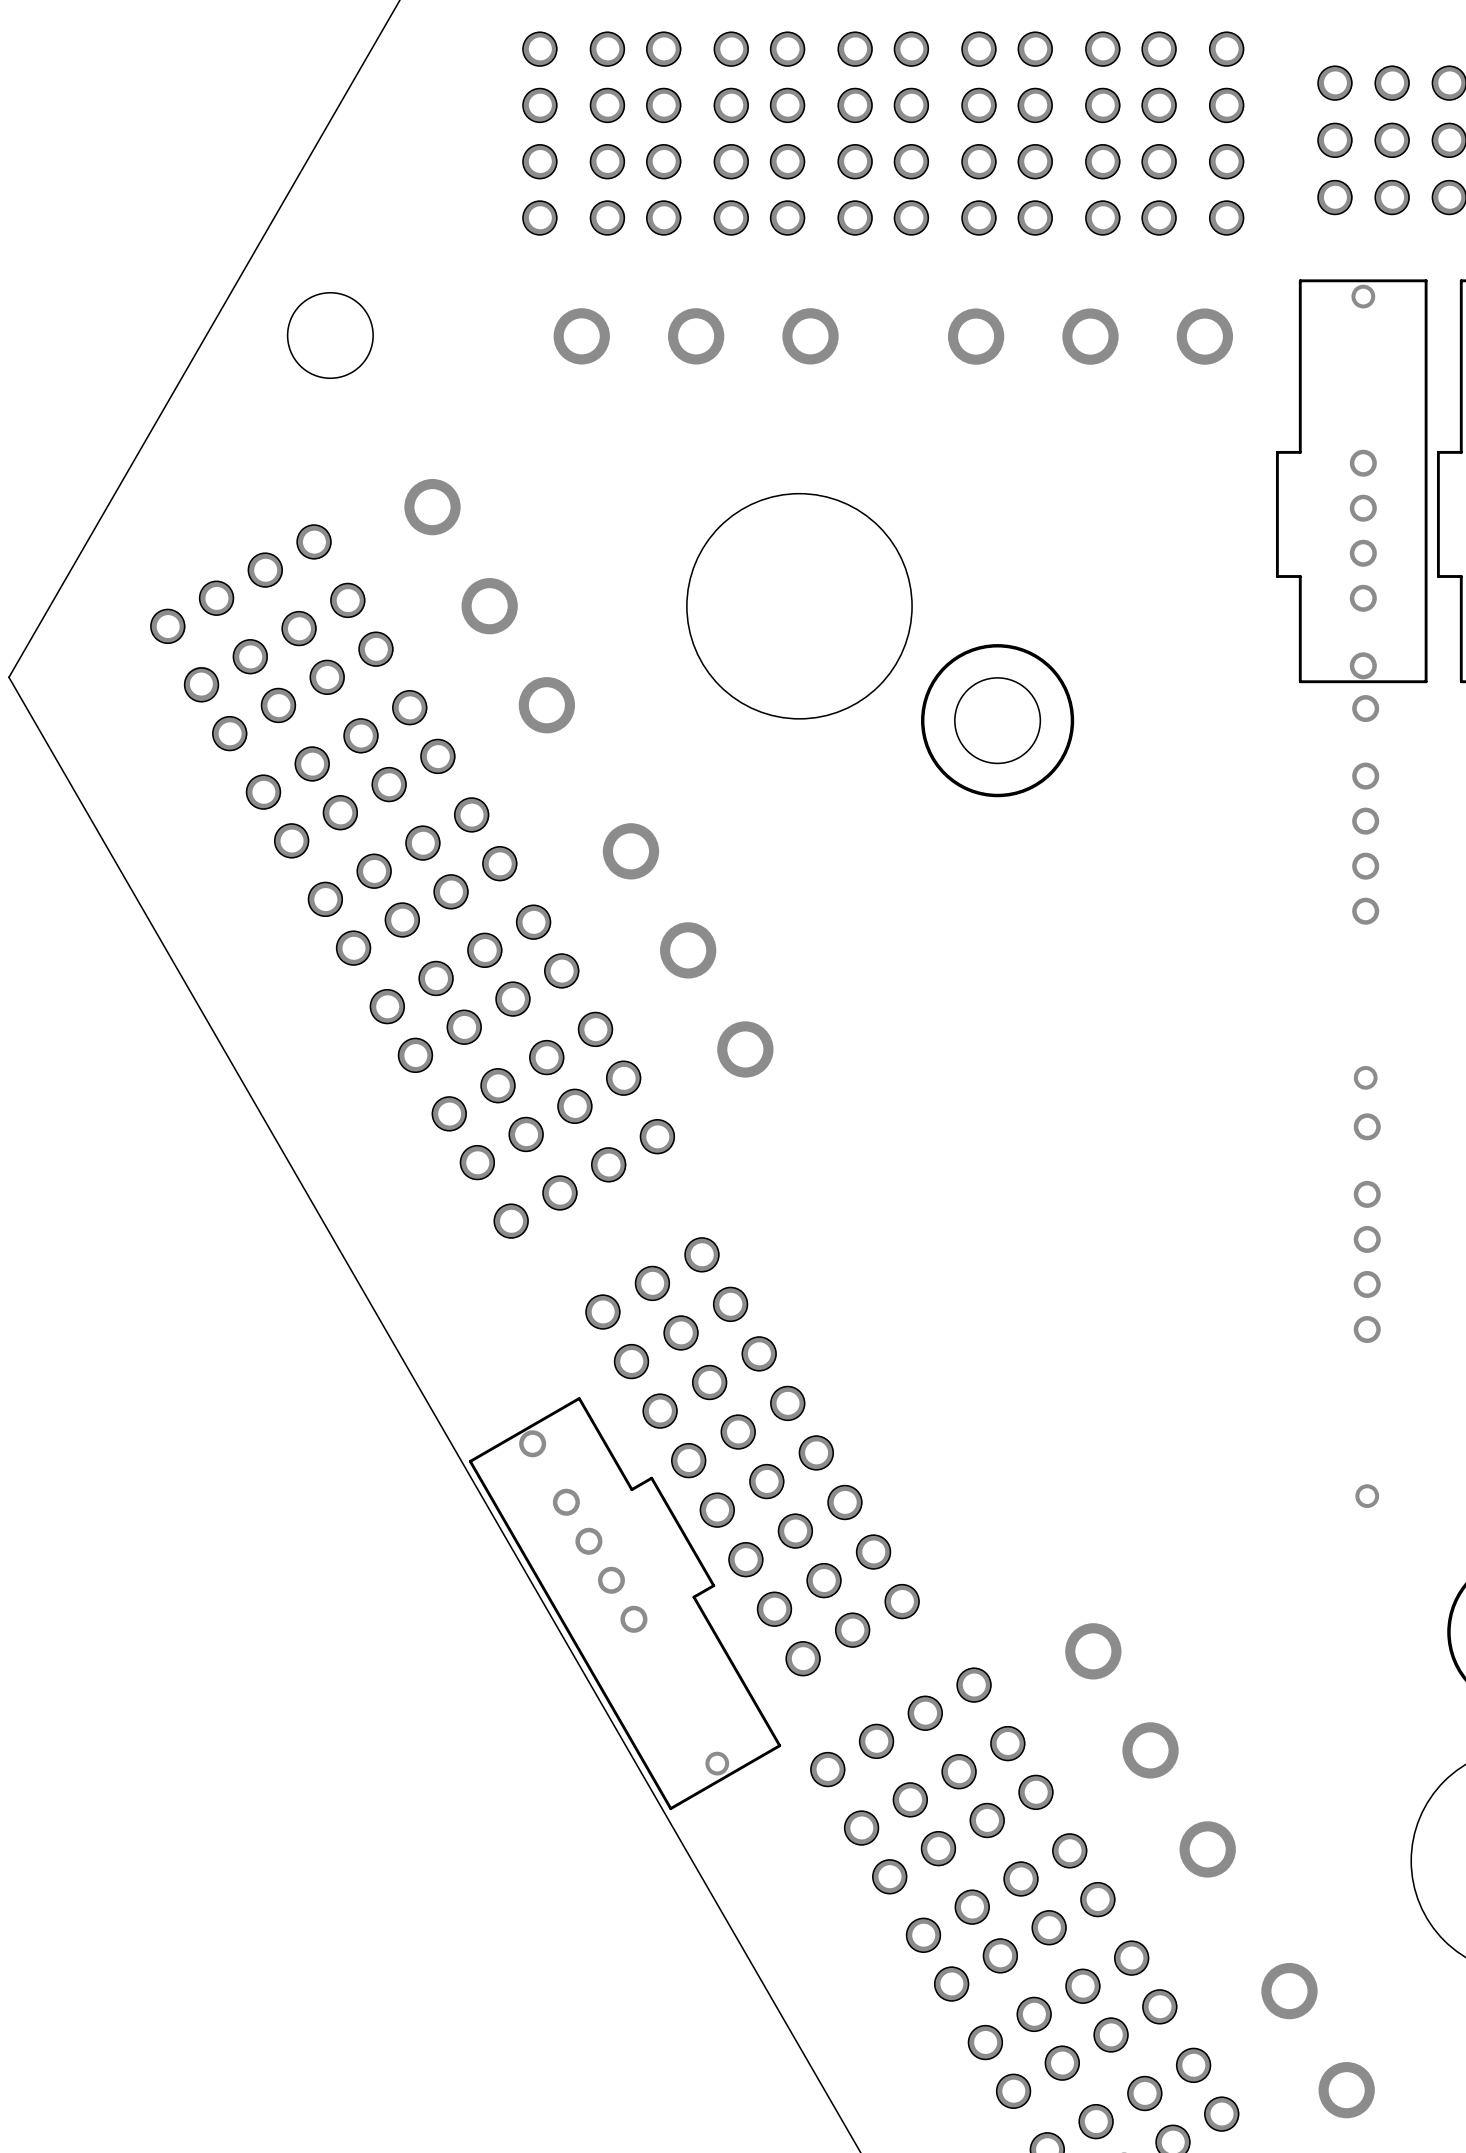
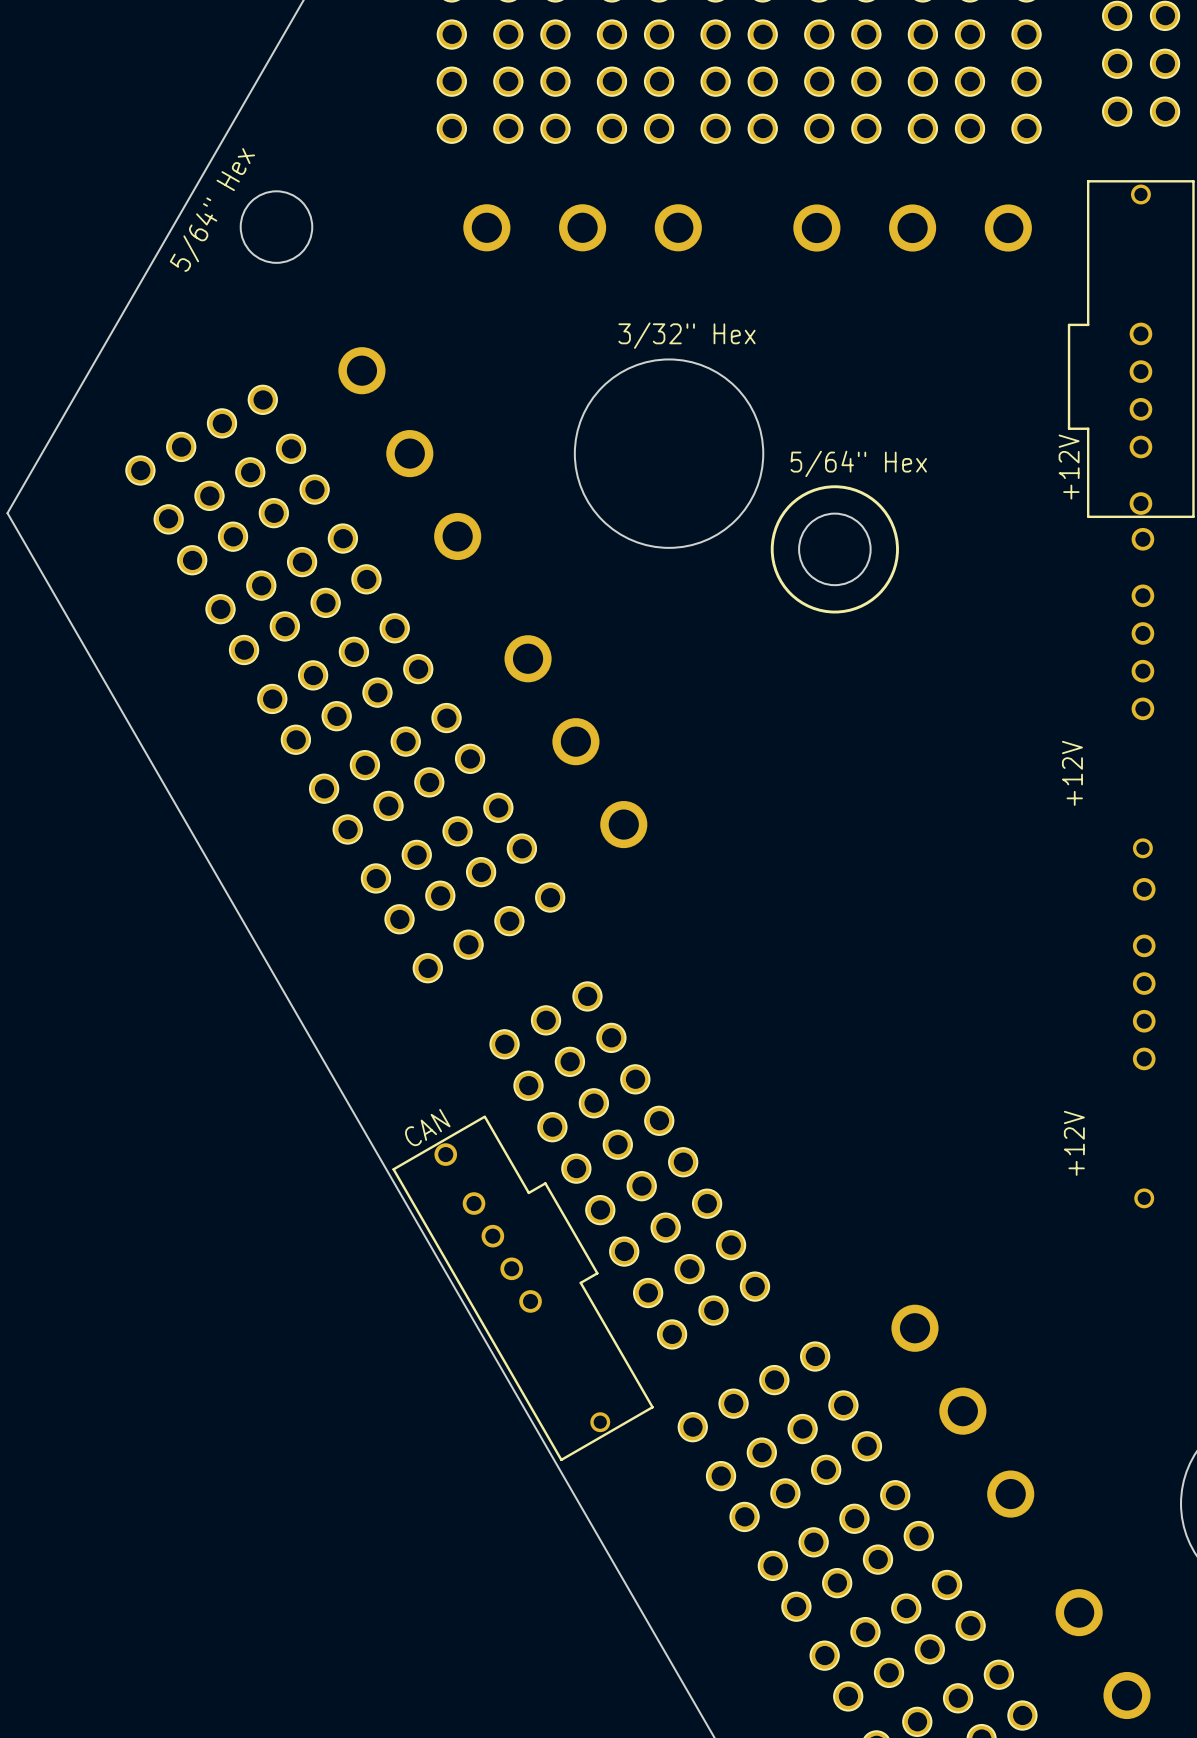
text: none -> 5/64" Hex (212, 209)
text: none -> 3/32" Hex (686, 335)
text: none -> 5/64" Hex (858, 463)
text: none -> +12V (1069, 467)
text: none -> +12V (1072, 773)
text: none -> CAN (427, 1127)
text: none -> +12V (1074, 1143)

